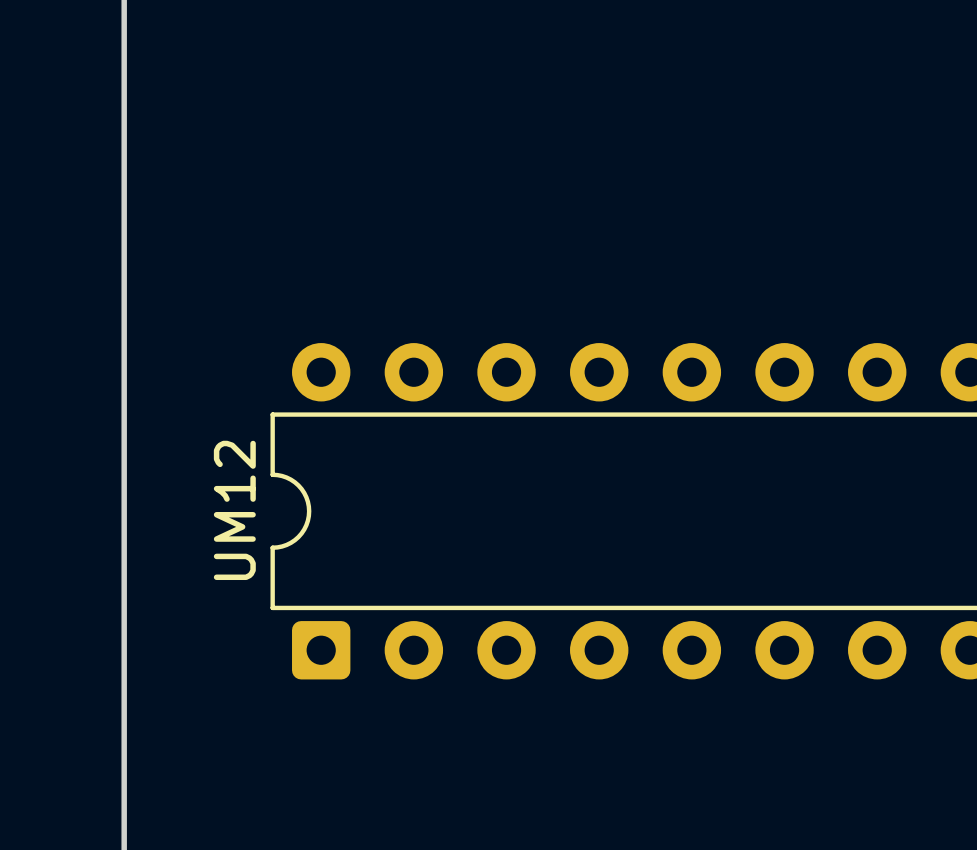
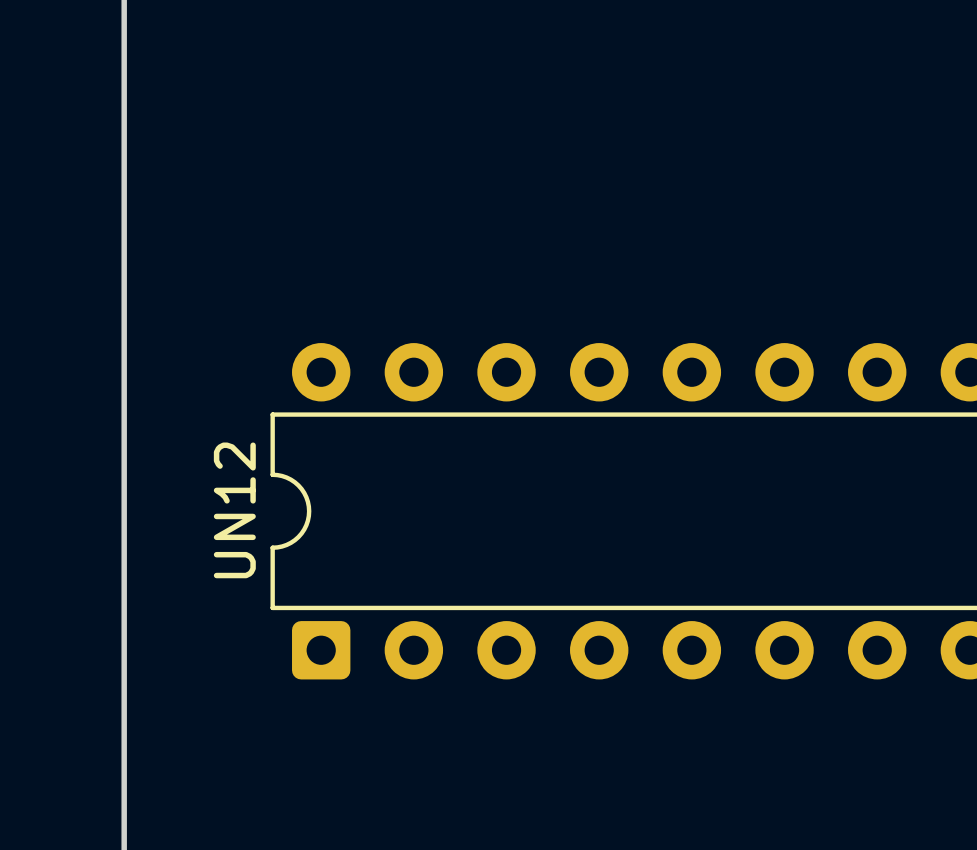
UM12 name: UM12 (234, 510) -> UN12 (234, 510)

